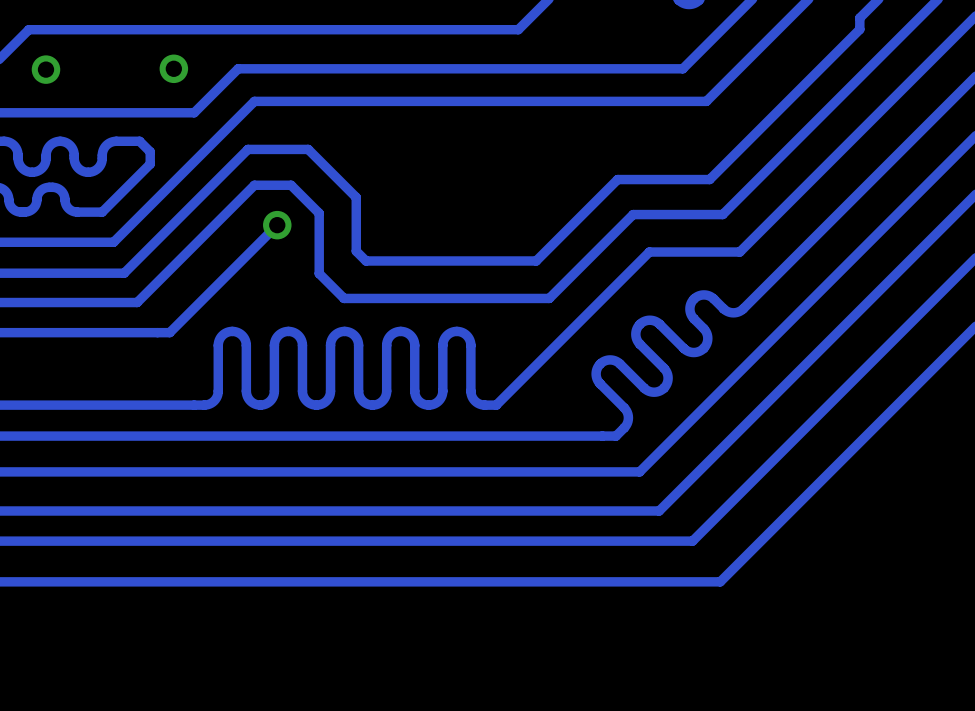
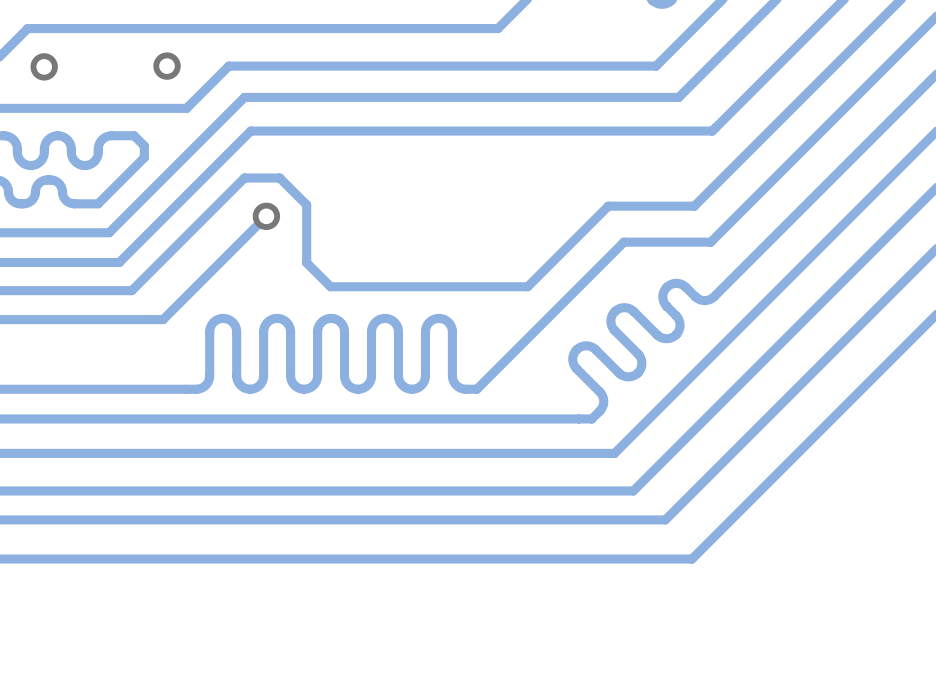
track: (859, 18) (859, 29) (709, 179) (617, 179) (536, 260) (366, 260) (356, 251) (356, 197) (308, 149) (247, 149) -> (826, 17) (712, 131) (250, 131) (238, 143)

